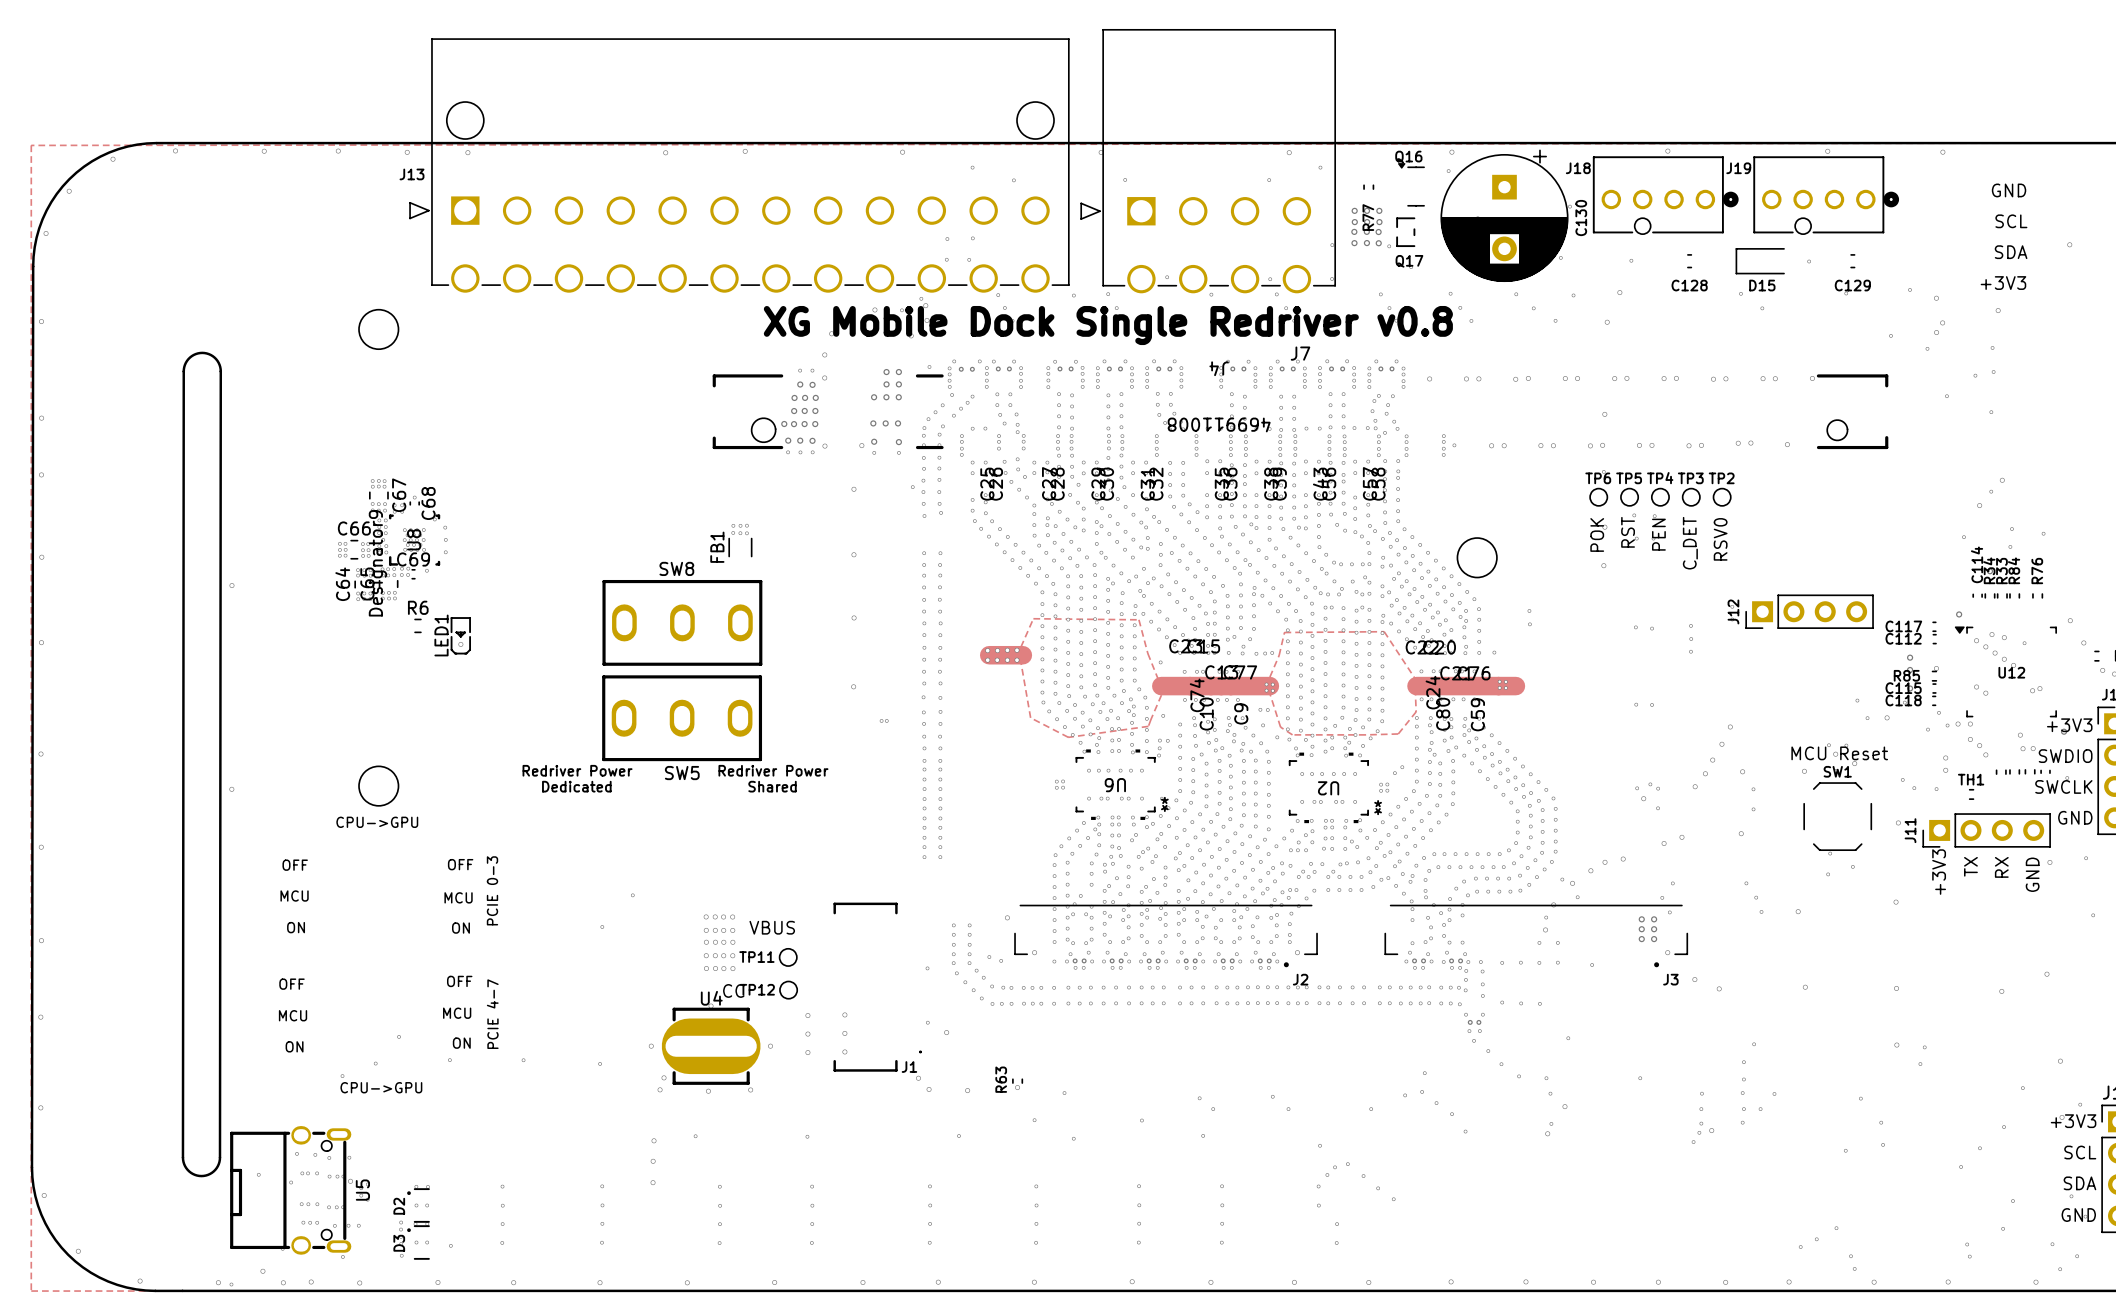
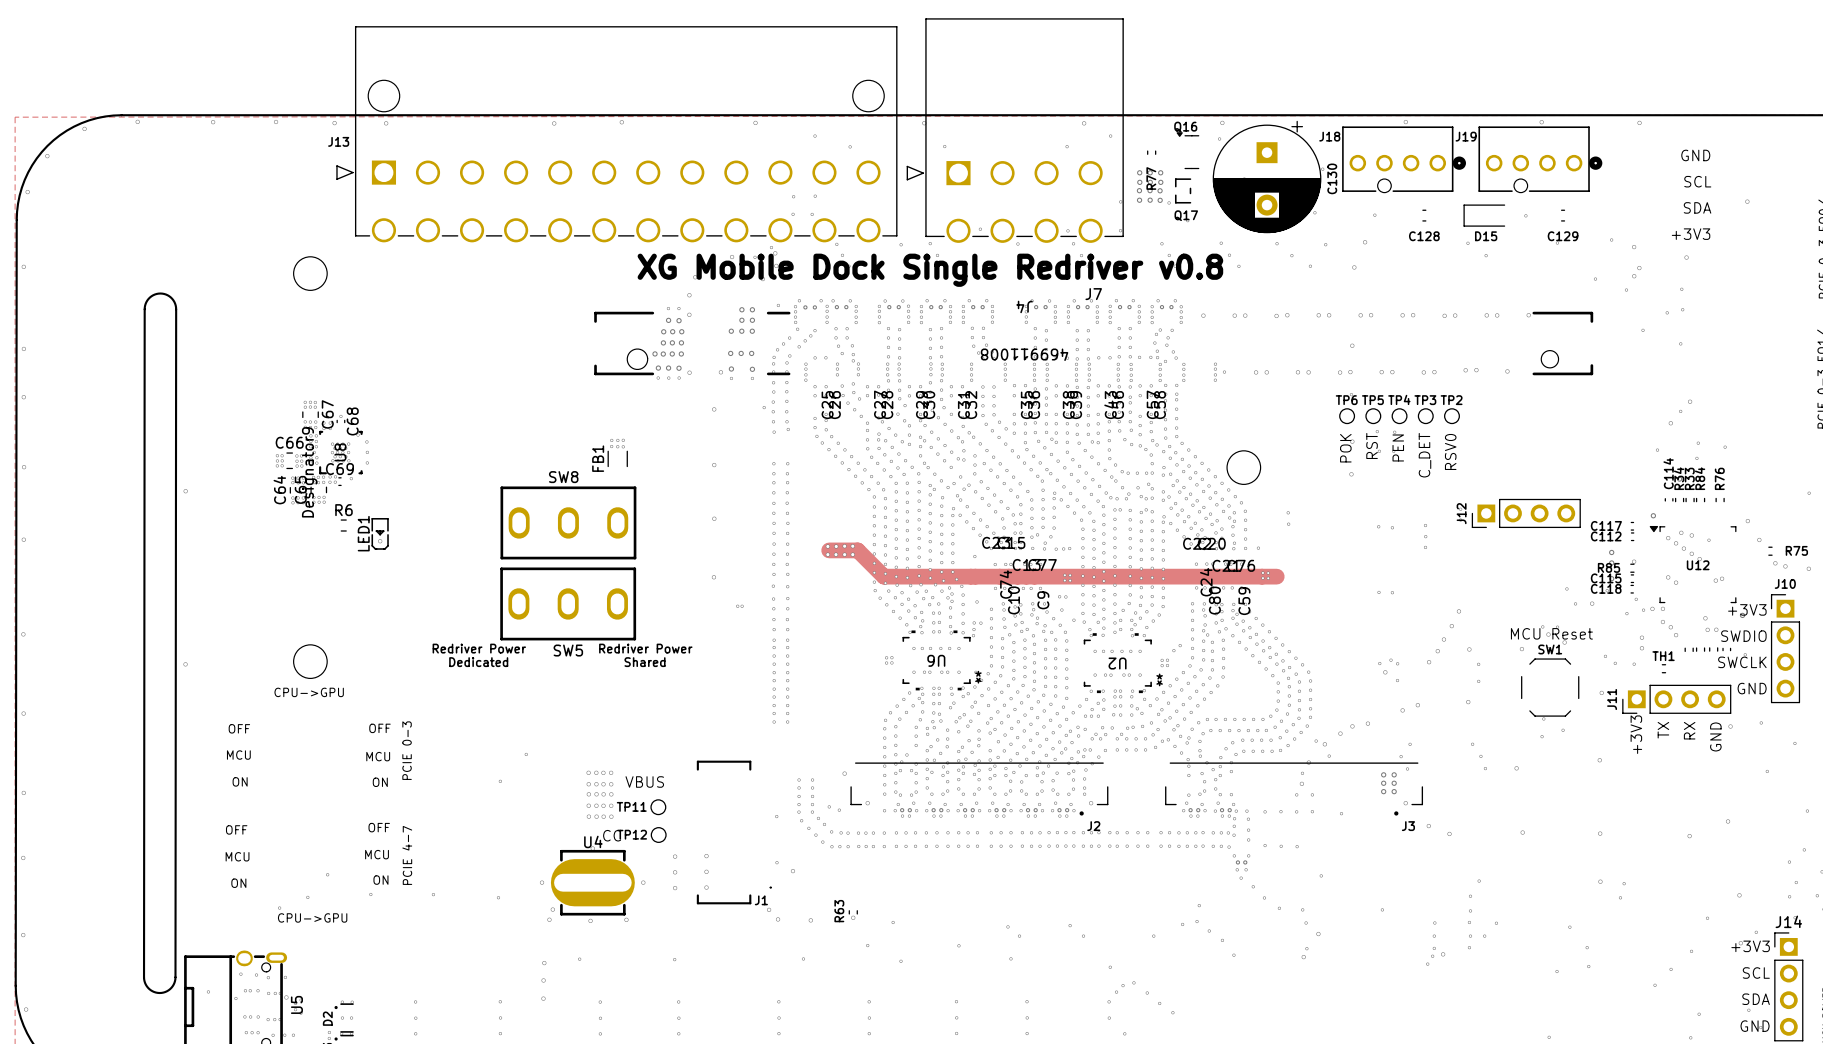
zone outline: (1033, 618) (1020, 647) (1021, 662) (1030, 717) (1068, 737) (1148, 726) (1163, 686) (1147, 653) (1138, 619) (1033, 618) -> none
zone outline: (1384, 631) (1284, 632) (1279, 655) (1269, 677) (1270, 694) (1280, 727) (1292, 734) (1398, 733) (1416, 711) (1414, 678) (1384, 631) -> none
track: none -> (857, 550) (883, 576) (975, 576)
track: none -> (1067, 576) (1192, 576)

